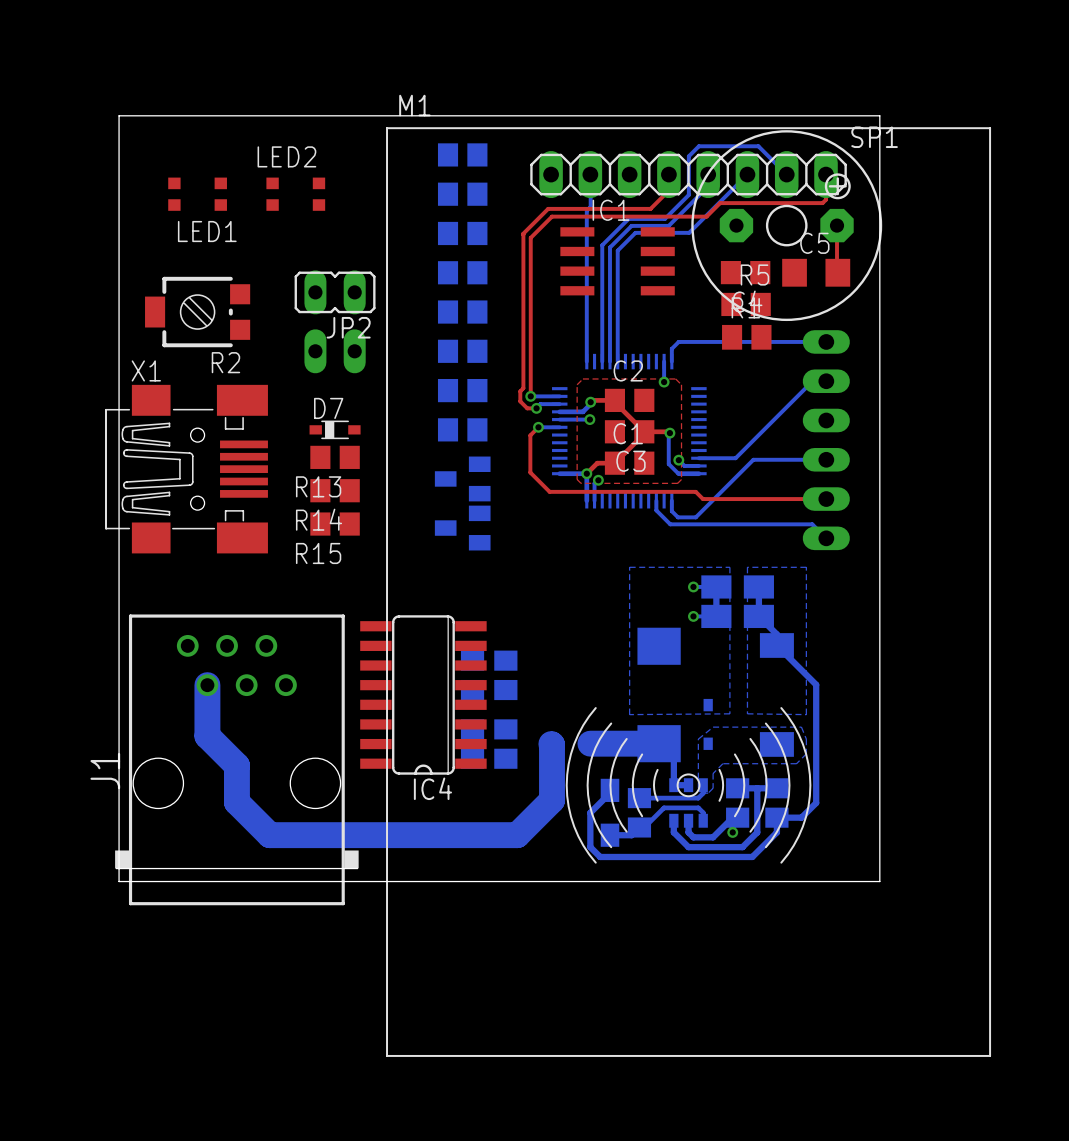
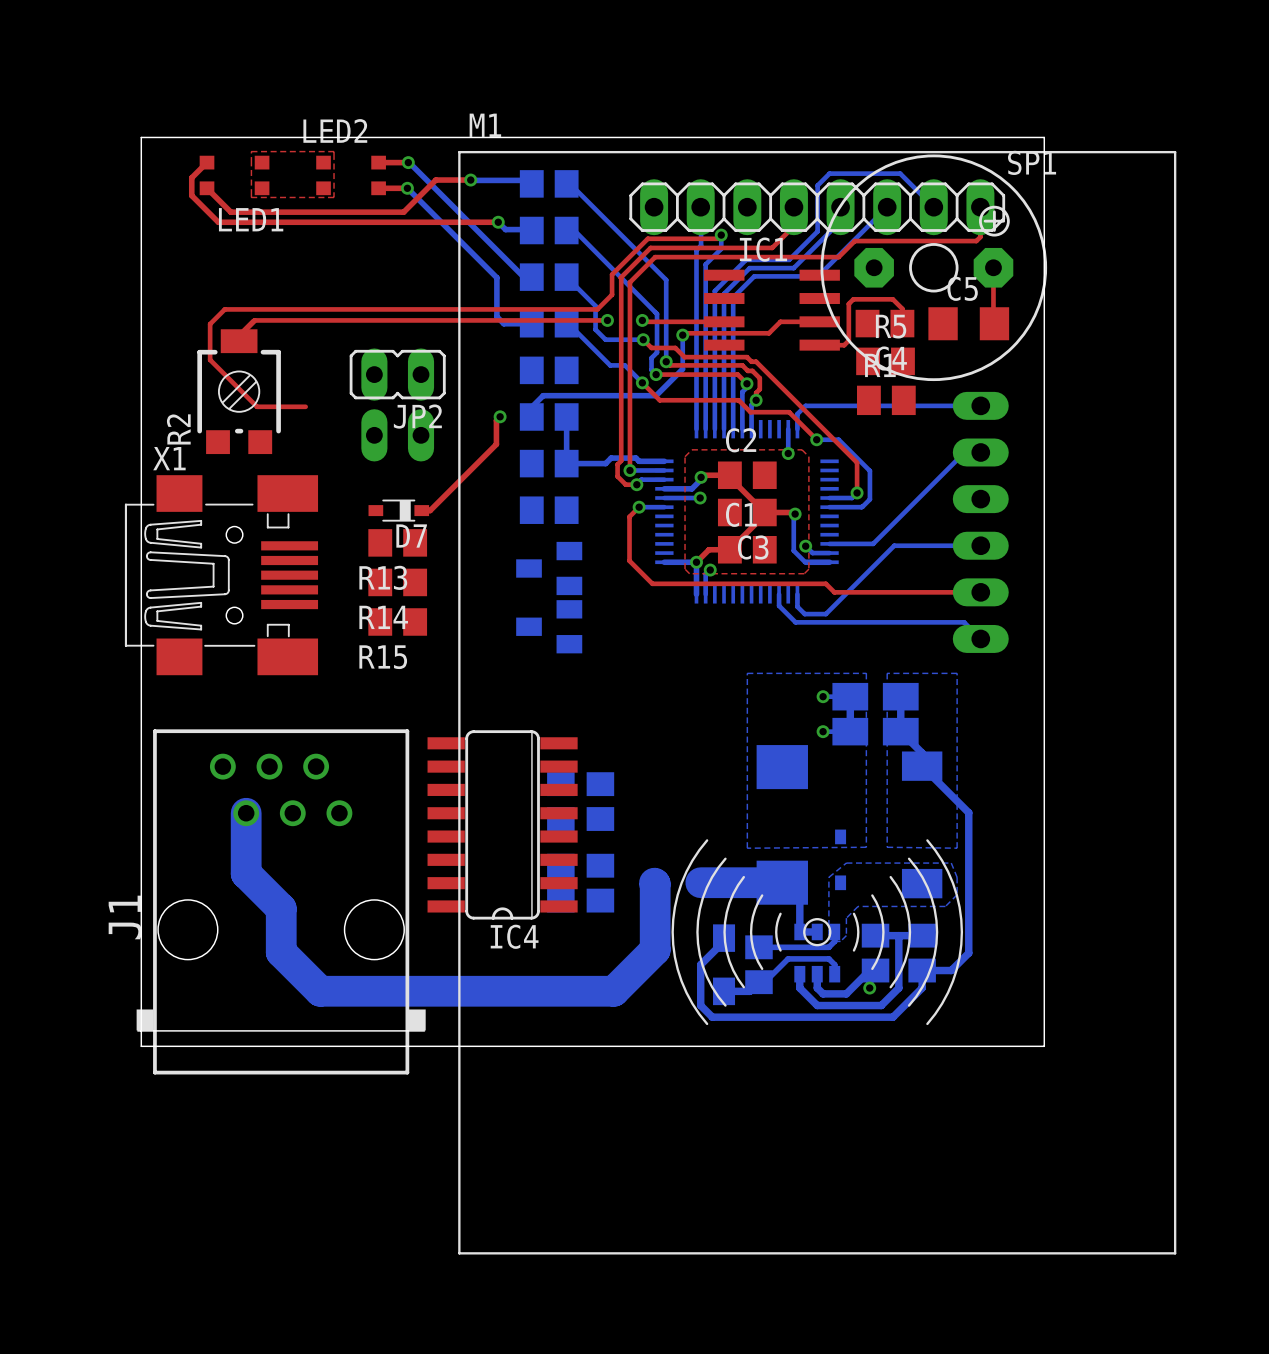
top zone outline: none -> (251, 151) (251, 197) (334, 197) (334, 151) (251, 151)
top track: none -> (207, 162) (191, 177) (191, 195) (218, 222) (498, 222)
top track: none -> (378, 162) (408, 162)
bottom track: none -> (408, 162) (523, 277) (531, 277)
via: none -> (408, 162)
bottom track: none -> (470, 180) (531, 180)
top track: none -> (470, 180) (435, 180) (403, 212) (230, 212) (207, 188)
via: none -> (470, 180)
bottom track: none -> (566, 180) (666, 279) (666, 361)
top track: none -> (378, 188) (407, 188)
bottom track: none -> (407, 188) (496, 277) (496, 316) (503, 323) (531, 323)
via: none -> (407, 188)
bottom track: none -> (498, 222) (505, 229) (531, 229)
via: none -> (498, 222)
bottom track: none -> (566, 229) (573, 229) (657, 314) (657, 352) (651, 358) (651, 369) (656, 374)
LED1 position: (197, 194) -> (234, 175)
LED2 position: (295, 194) -> (351, 175)
bottom track: none -> (721, 235) (721, 248) (705, 264) (705, 429)
top track: none -> (721, 235) (717, 238) (647, 238) (612, 274) (612, 294) (597, 309) (224, 309) (210, 324) (210, 359) (257, 406) (305, 406)
via: none -> (721, 235)
bottom track: none -> (566, 277) (595, 306) (595, 329) (605, 339) (643, 339)
IC1 position: (617, 261) -> (772, 310)
top track: none -> (607, 320) (254, 320) (239, 335) (239, 341)
via: none -> (607, 320)
top track: none -> (642, 320) (724, 321)
via: none -> (642, 320)
top track: none -> (819, 321) (780, 321) (768, 333) (684, 333) (682, 335)
bottom track: none -> (566, 323) (610, 365) (624, 365) (642, 382)
top track: none -> (902, 323) (902, 308) (892, 299) (853, 299) (848, 303) (848, 340) (844, 345) (819, 345)
bottom track: none -> (682, 335) (682, 369) (656, 395) (543, 395) (531, 407) (531, 416)
via: none -> (682, 335)
top track: none -> (643, 339) (651, 347) (675, 347) (684, 357) (746, 357) (751, 361) (756, 361) (857, 462) (857, 492)
via: none -> (643, 339)
JP2 position: (335, 292) -> (397, 374)
top track: none -> (666, 361) (669, 365) (742, 365) (747, 370) (752, 370) (759, 378) (759, 389) (756, 392) (756, 400)
via: none -> (666, 361)
R2 rotation: 0° (197, 312) -> 90° clockwise (239, 391)
top track: none -> (656, 374) (737, 374) (746, 383)
via: none -> (656, 374)
top track: none -> (642, 382) (659, 400) (738, 400) (750, 412) (789, 412) (816, 439)
via: none -> (642, 382)
bottom track: none -> (746, 383) (746, 387) (742, 392) (742, 429)
via: none -> (746, 383)
bottom track: none -> (756, 400) (751, 404) (751, 429)
via: none -> (756, 400)
part position: (335, 351) -> (397, 435)
top track: none -> (500, 416) (496, 420) (496, 444) (430, 510) (421, 510)
via: none -> (500, 416)
bottom track: none -> (566, 416) (566, 463) (605, 463) (611, 458) (635, 458) (639, 461) (664, 461)
bottom track: none -> (816, 439) (838, 439) (869, 470) (869, 499) (862, 506) (829, 507)
via: none -> (816, 439)
bottom track: none -> (857, 492) (852, 498) (829, 498)
via: none -> (857, 492)
D7 rotation: 0° (335, 429) -> 180° (398, 510)
X1 position: (186, 469) -> (221, 575)

